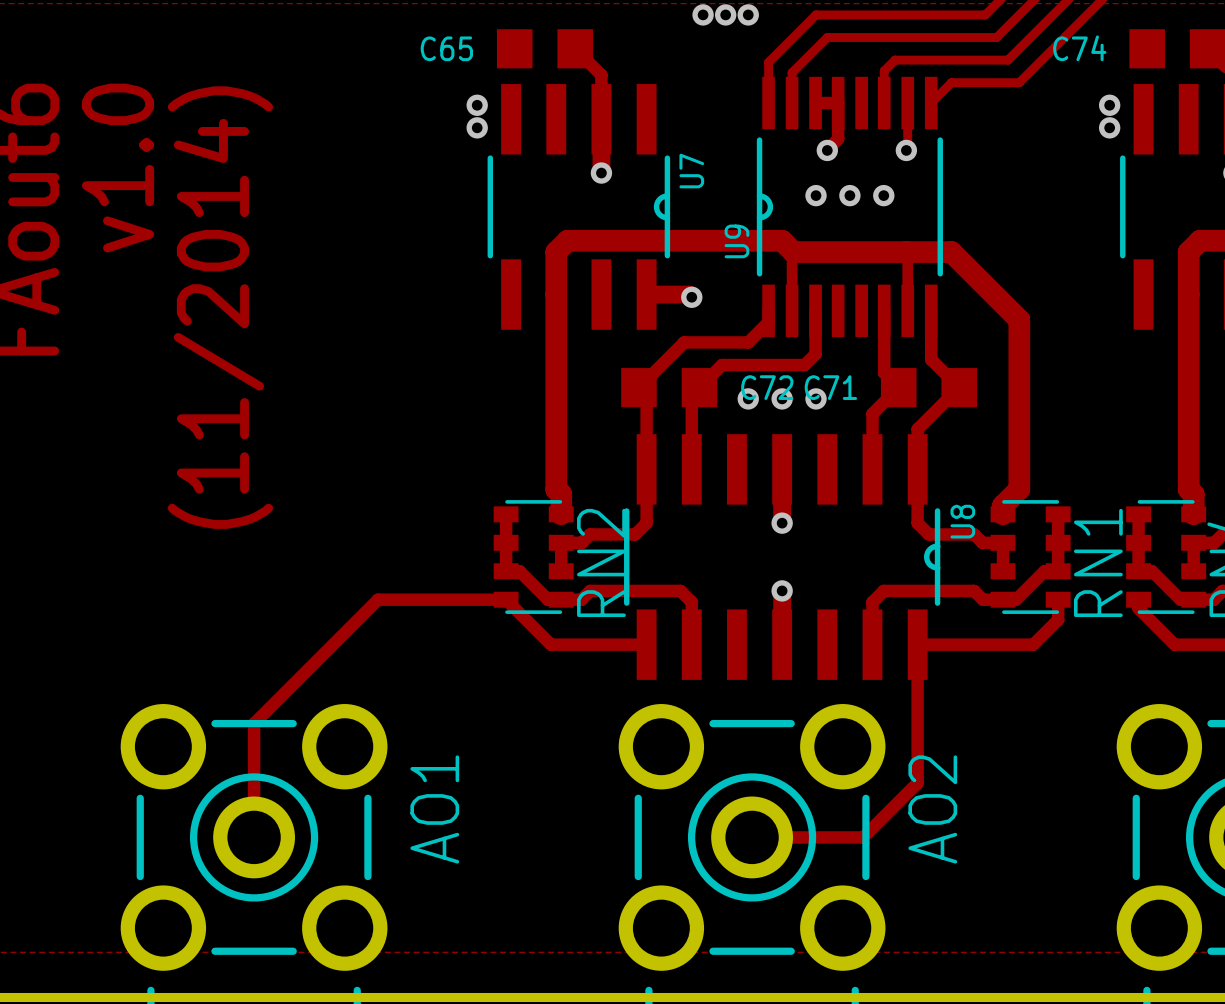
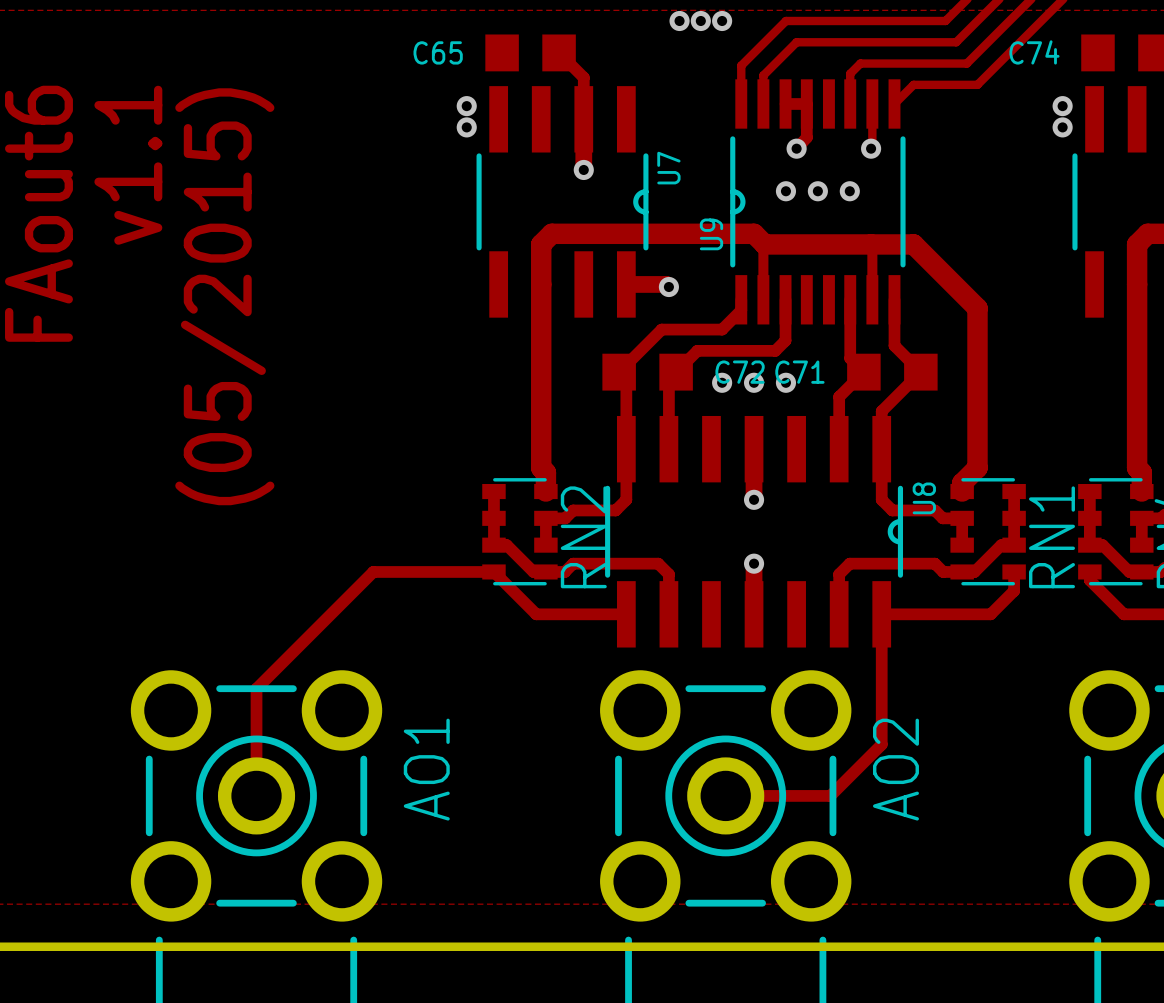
text: v1.0 (118, 168) -> v1.1 (128, 165)
text: (11/2014) (220, 307) -> (05/2015) (224, 296)

